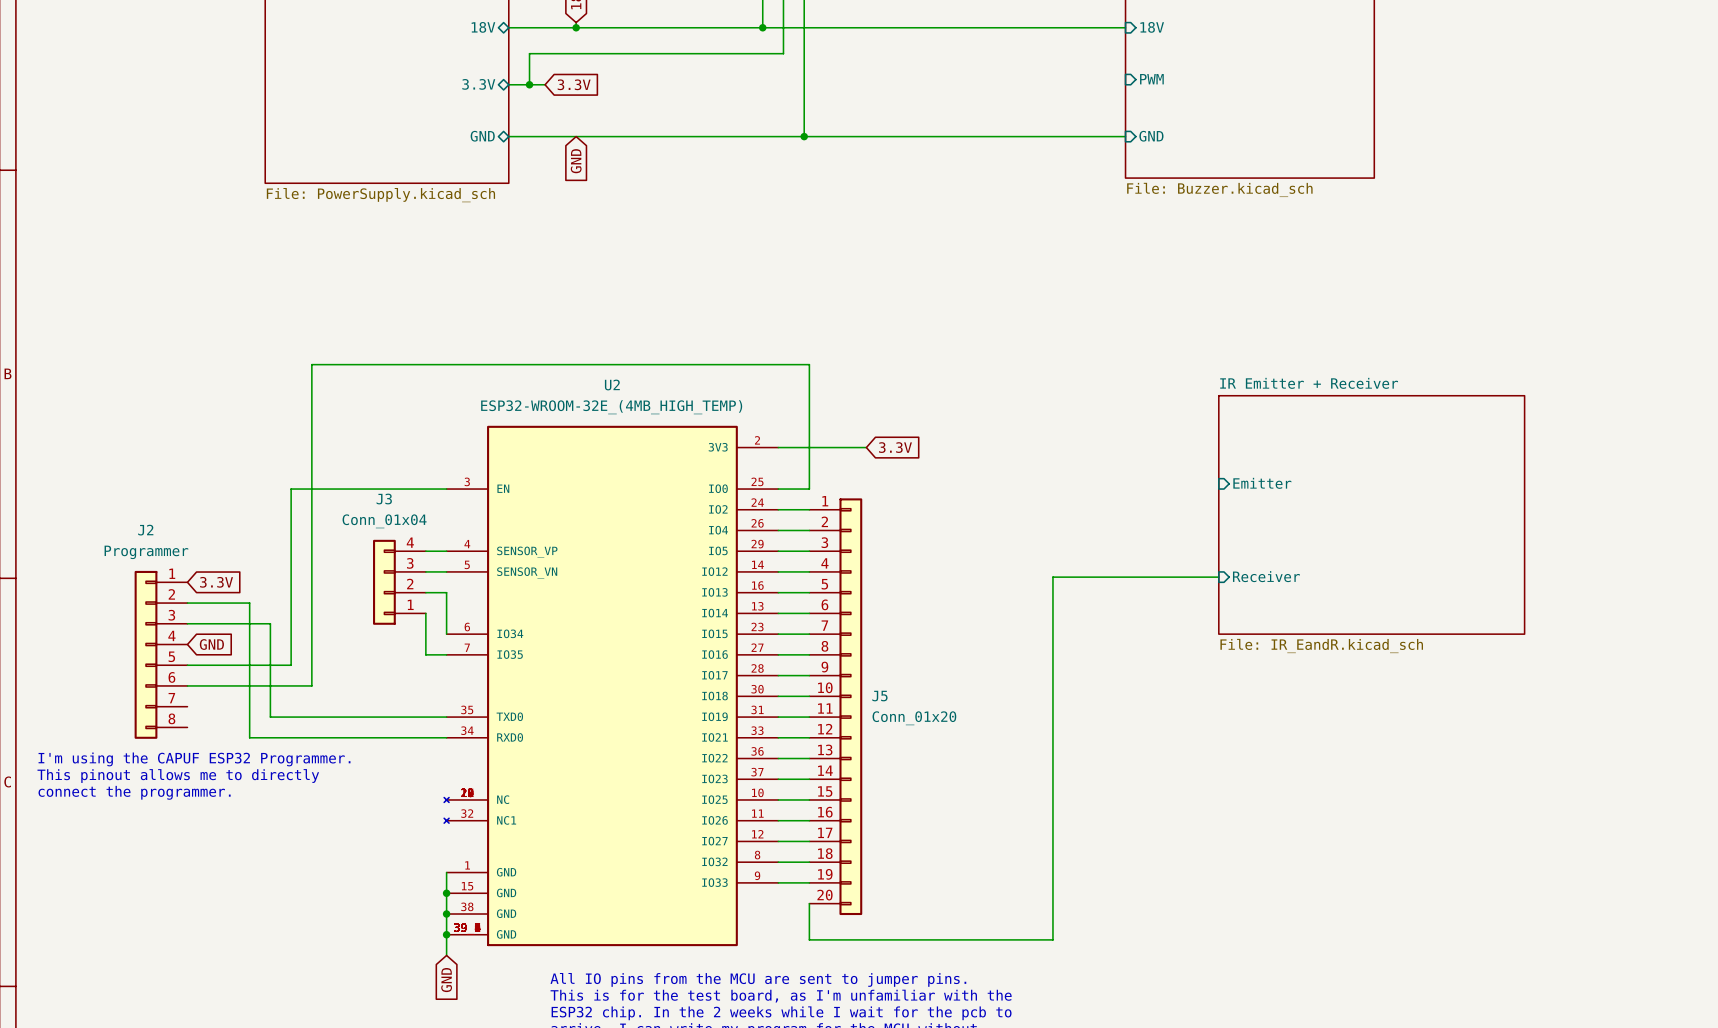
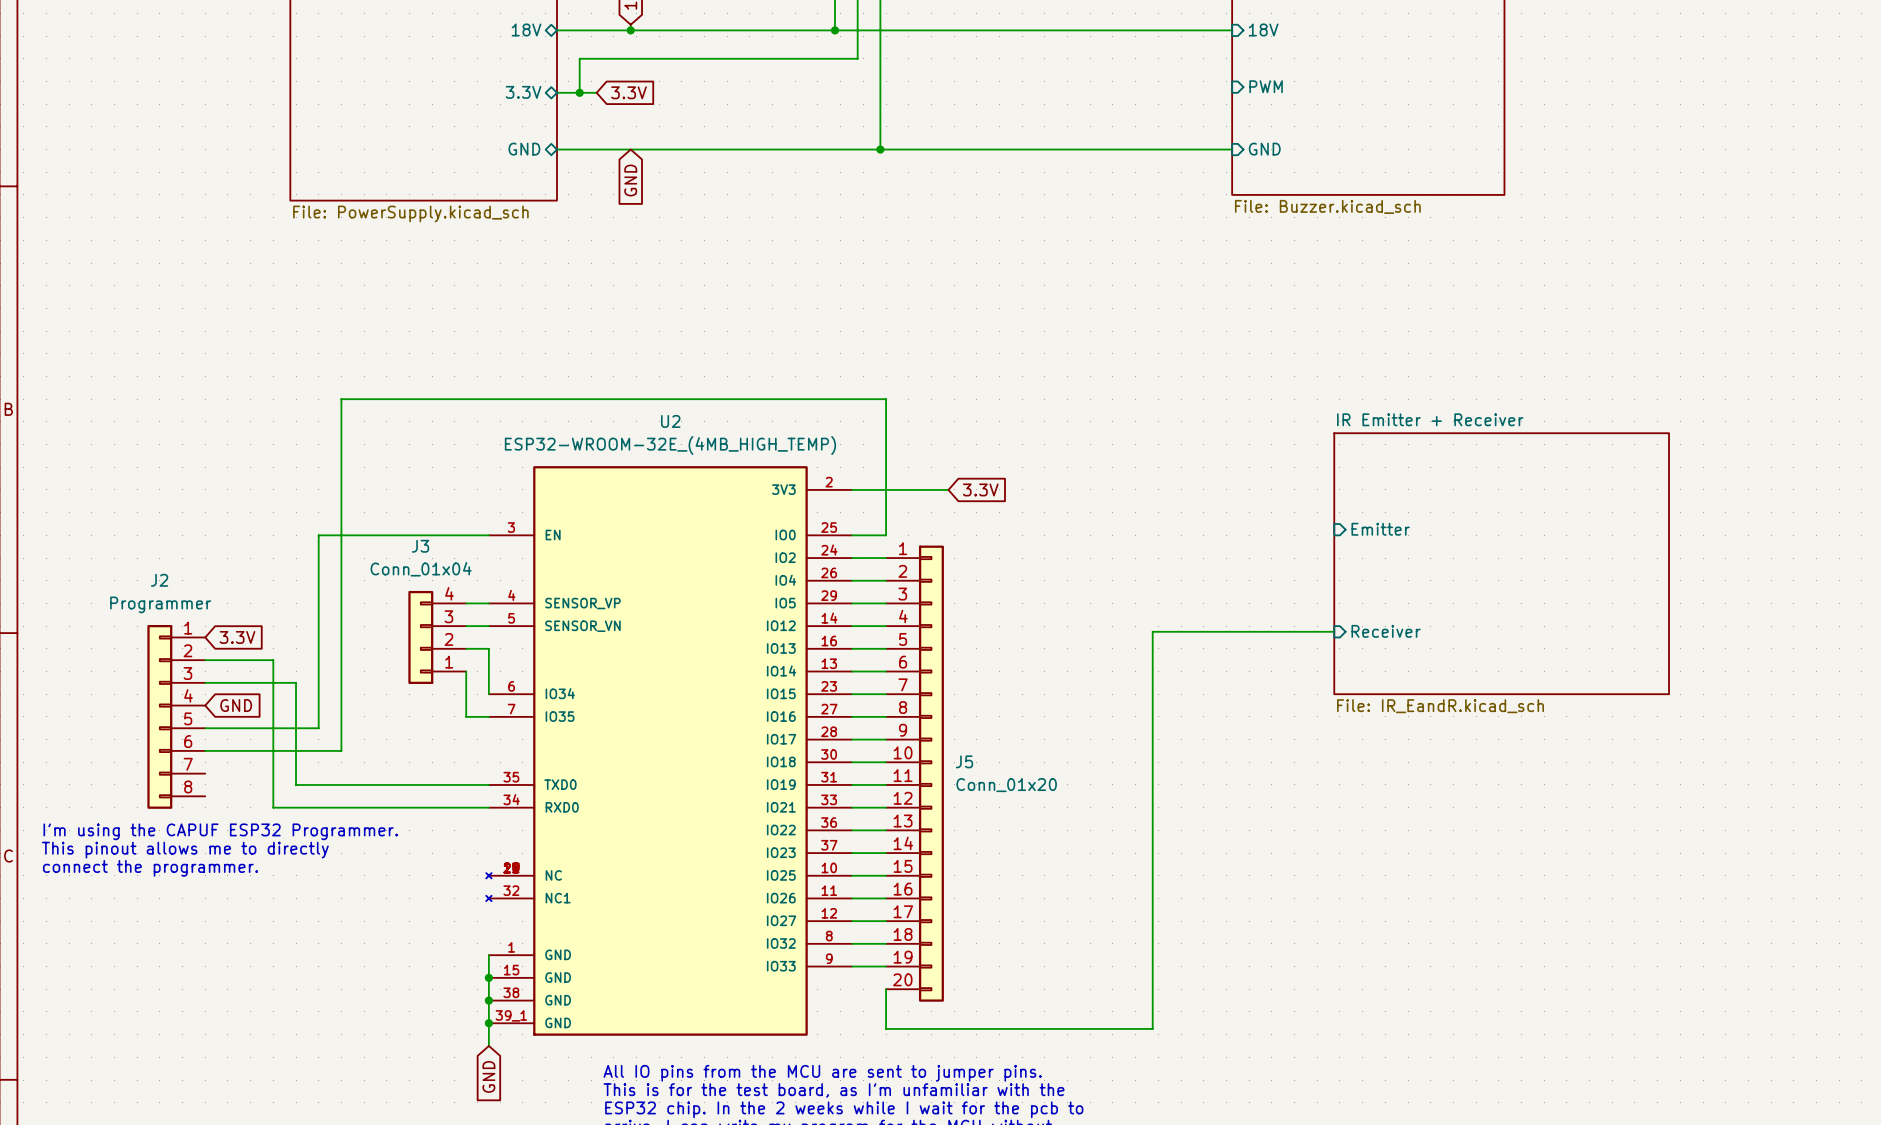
U2 symbol: [444, 425, 779, 947] -> [486, 466, 853, 1036]

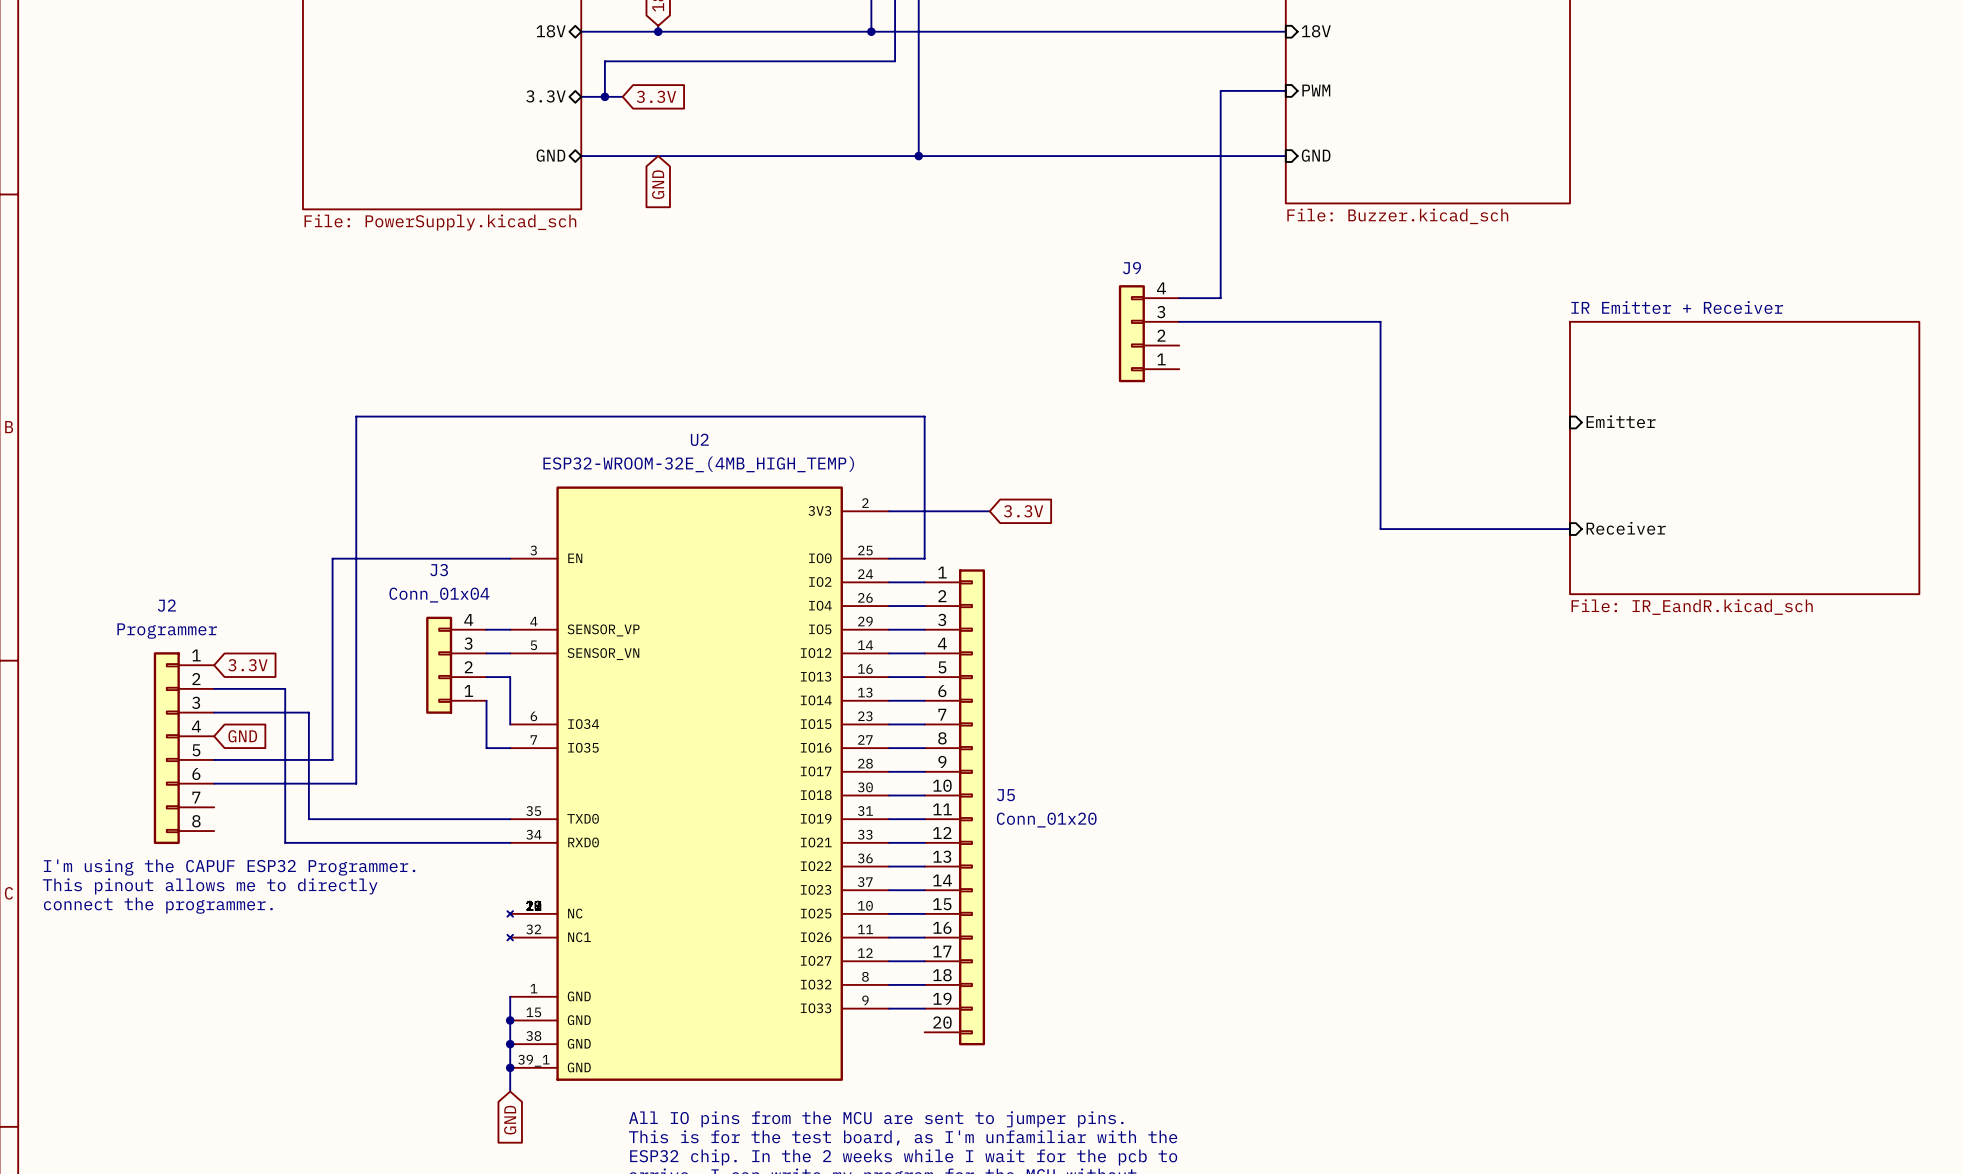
wire: none -> (1285, 90) (1220, 90) (1220, 298) (1179, 298)
wire: none -> (1179, 321) (1380, 321) (1380, 529) (1570, 529)
J9: none -> (1149, 333)
sheet pin position: Emitter (1380, 529) -> Emitter (1621, 421)
sheet IR Emitter + Receiver position: (1501, 563) -> (1744, 458)
wire: (1334, 631) (1152, 631) (1152, 1028) (886, 1028) (886, 989) -> none
sheet pin position: Receiver (1386, 631) -> Receiver (1626, 528)

